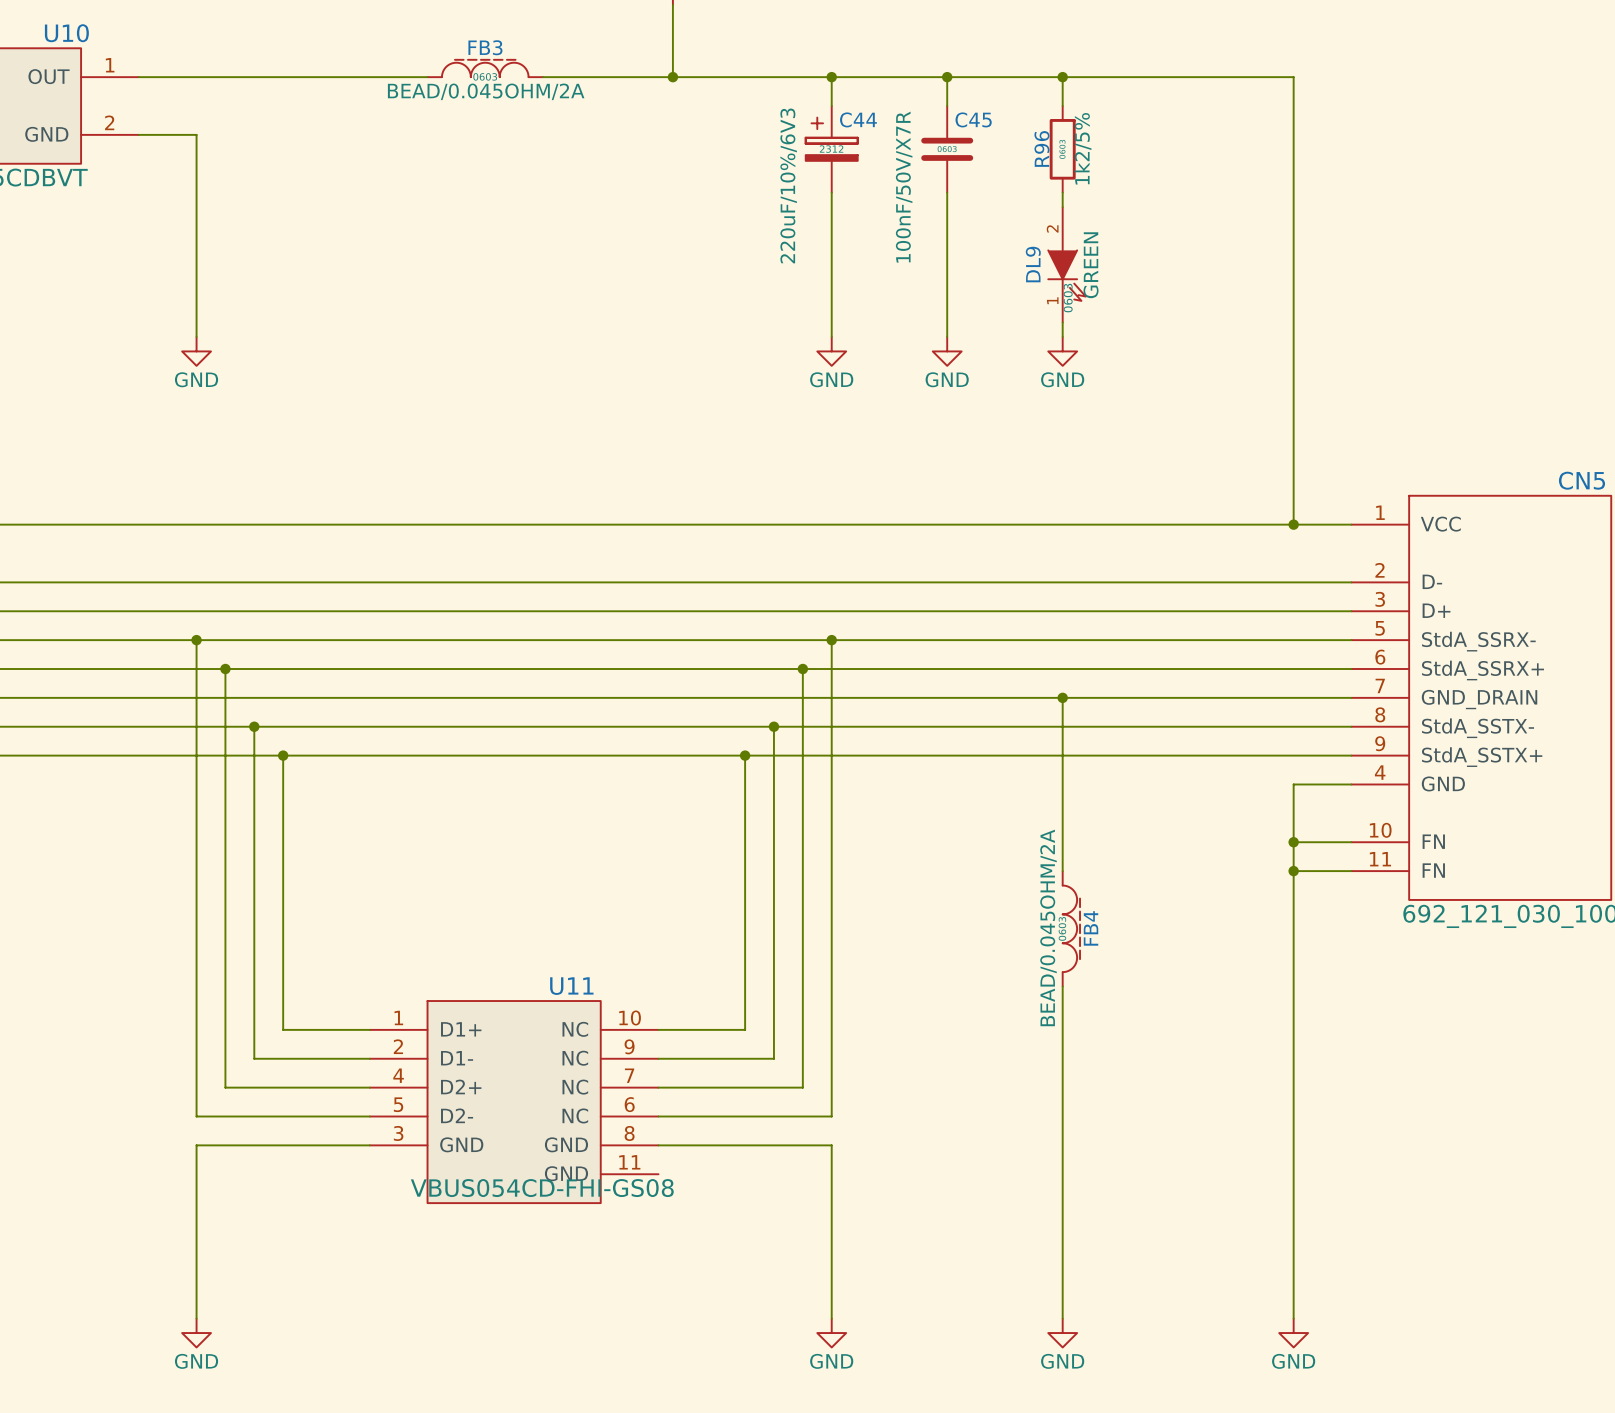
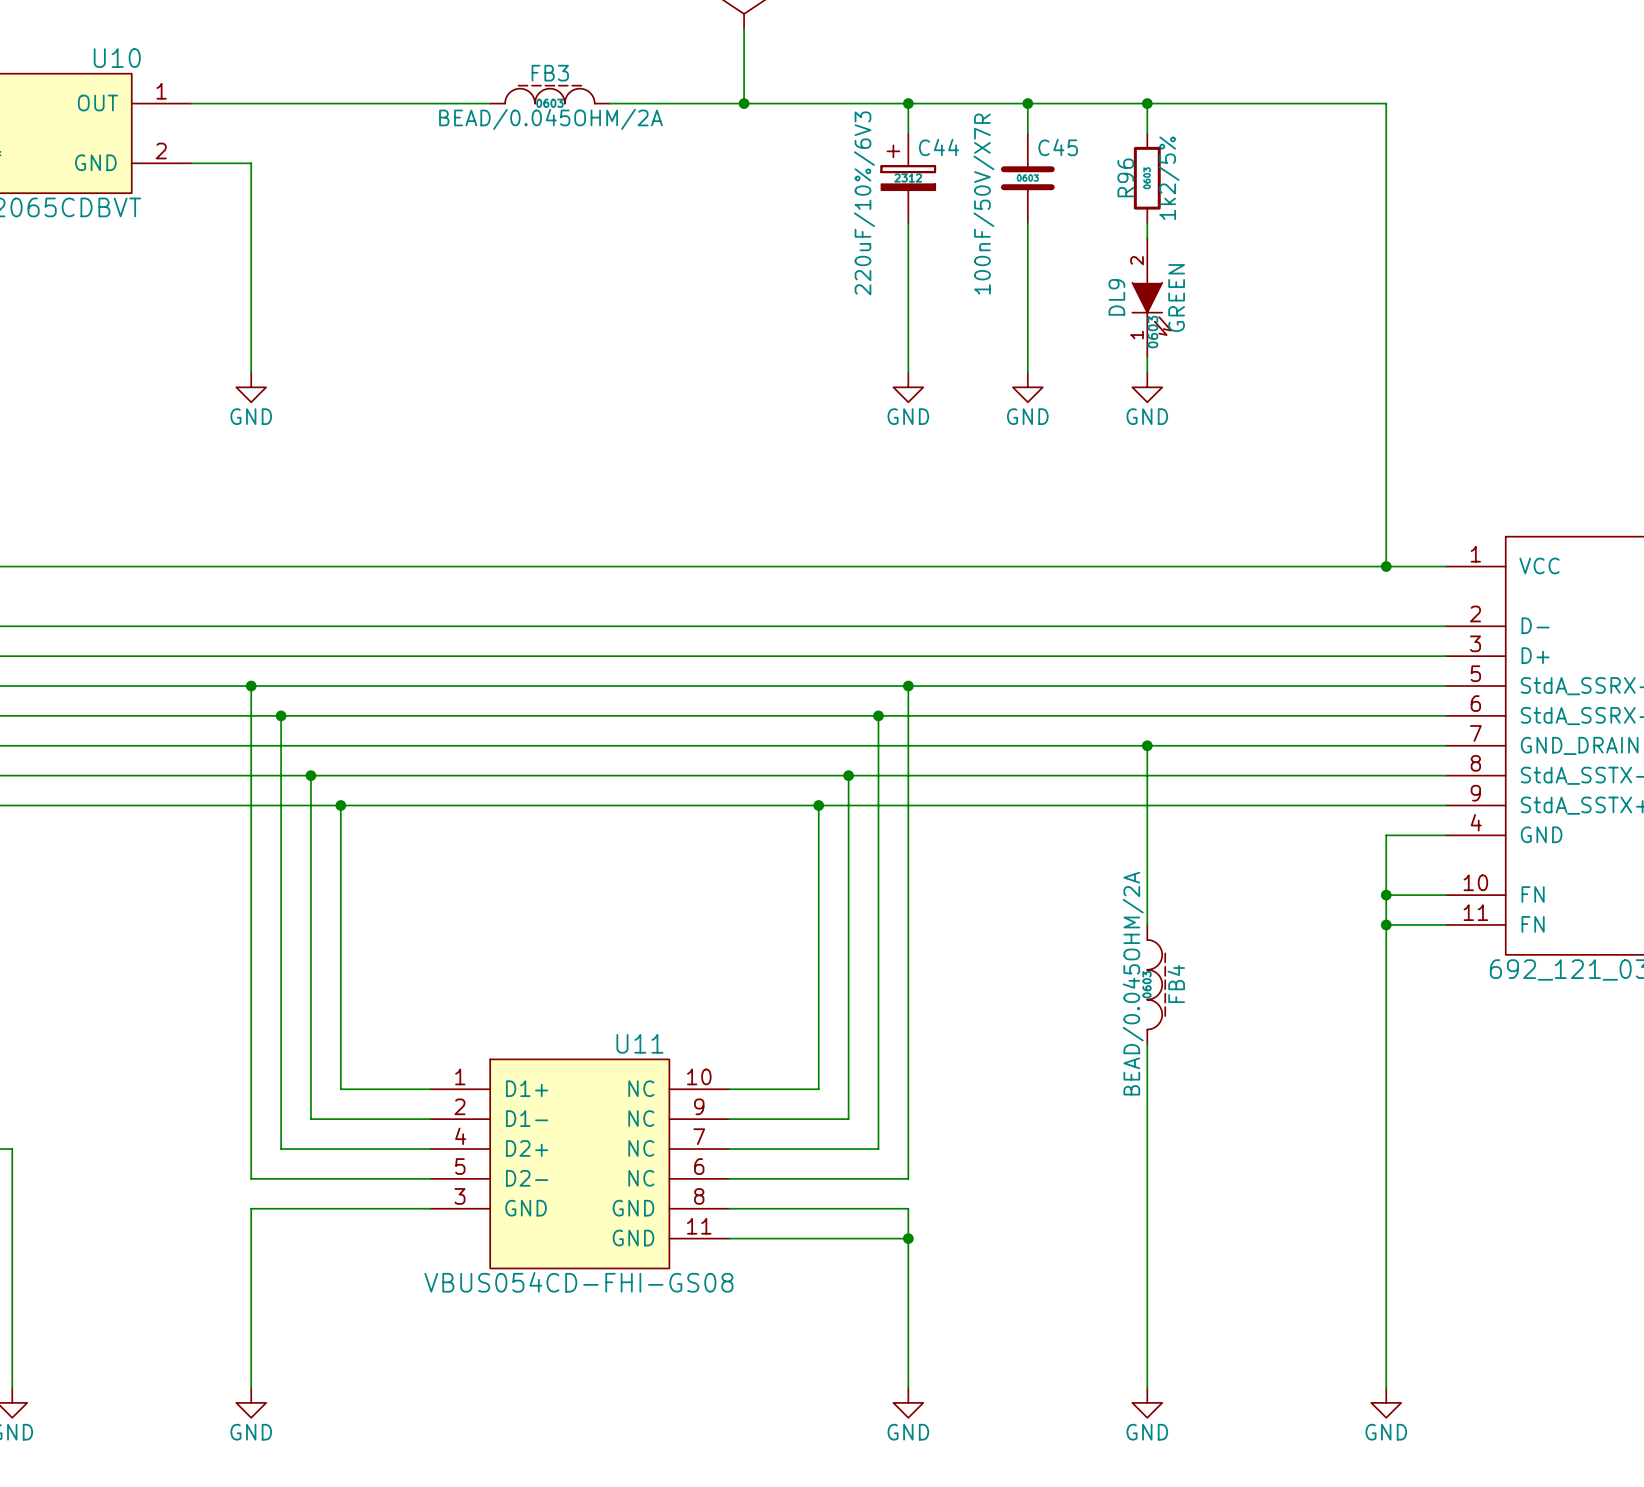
wire: none -> (729, 1238) (908, 1238)
junction: none -> (908, 1238)
U11 value position: VBUS054CD-FHI-GS08 (542, 1188) -> VBUS054CD-FHI-GS08 (578, 1282)

